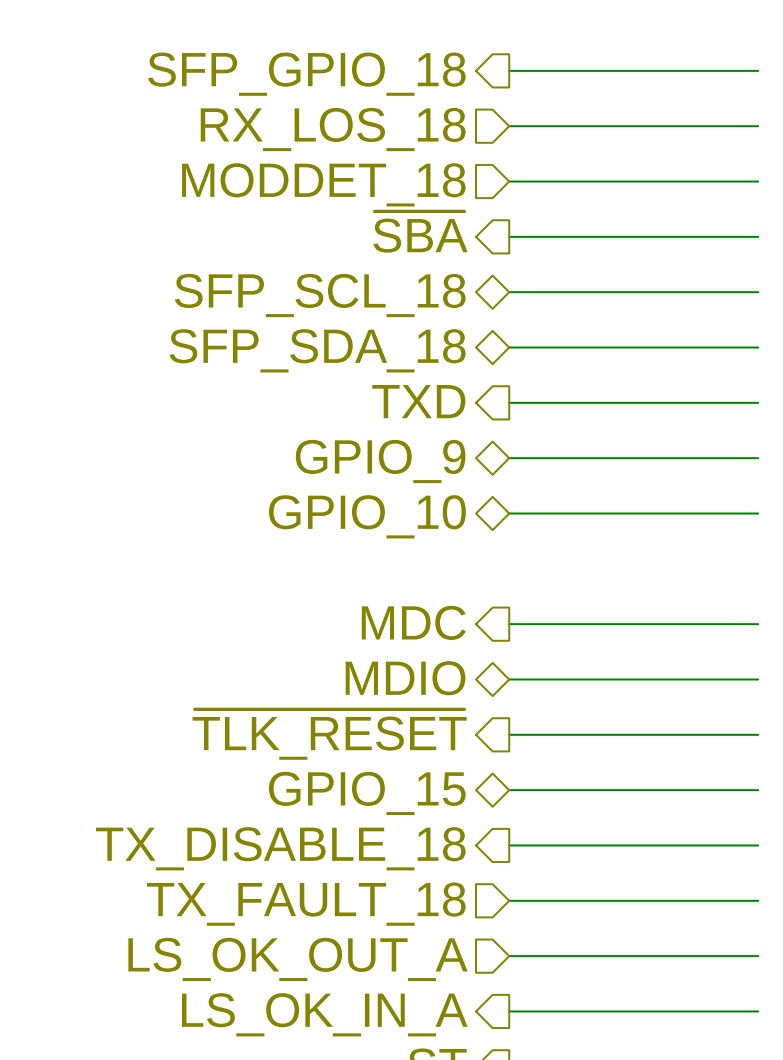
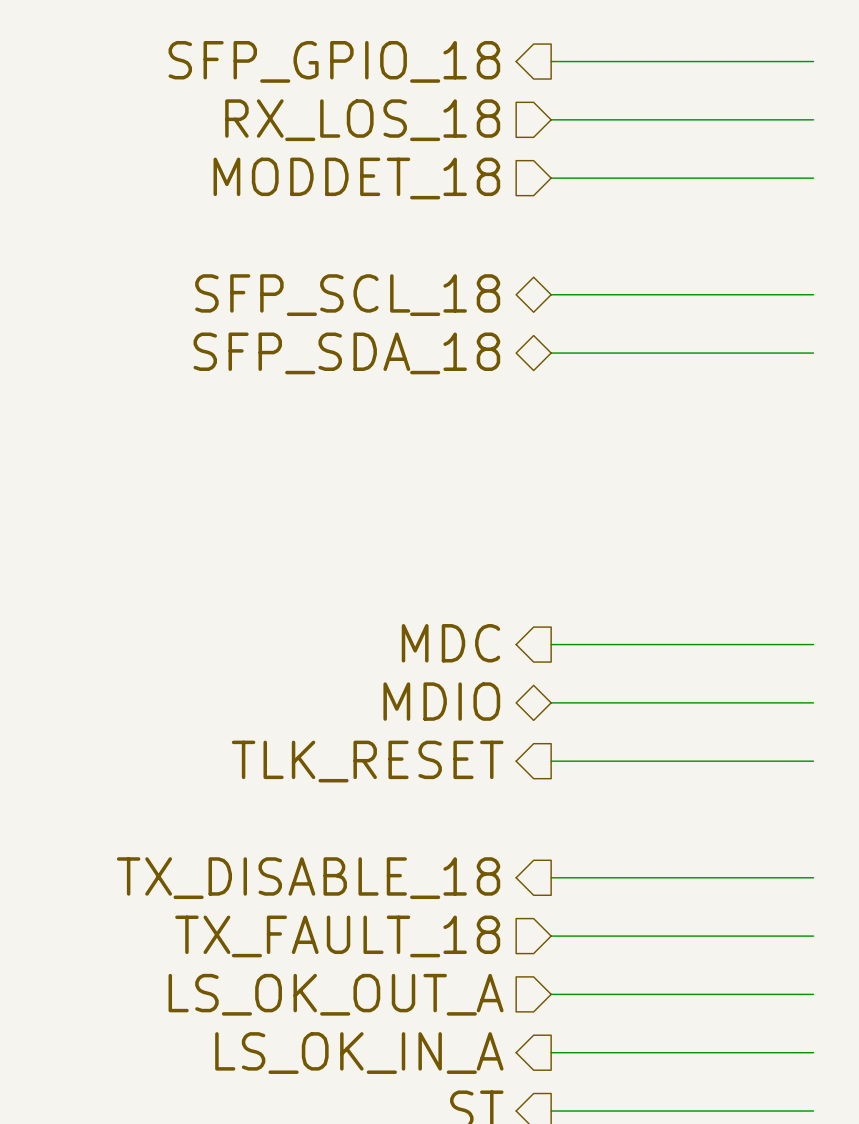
hierarchical label: ~{SBA} (420, 232) -> none
wire: (509, 236) (758, 236) -> none
hierarchical label: TXD (418, 401) -> none
wire: (509, 402) (758, 402) -> none
wire: (509, 458) (758, 458) -> none
hierarchical label: GPIO_9 (380, 461) -> none
wire: (509, 513) (758, 513) -> none
hierarchical label: GPIO_10 (367, 516) -> none
hierarchical label: ~{TLK_RESET} (329, 734) -> TLK_RESET (367, 761)
wire: (509, 790) (758, 790) -> none
hierarchical label: GPIO_15 (367, 793) -> none

